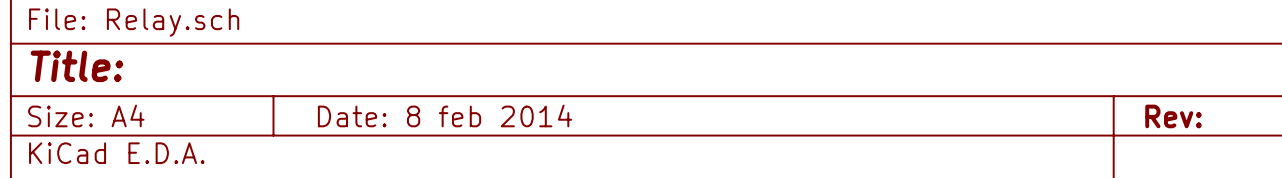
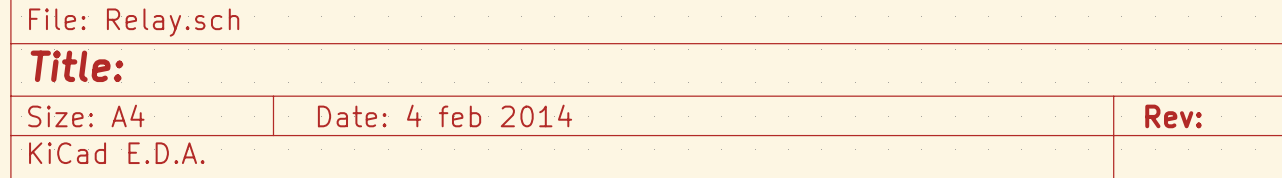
title block: Date: 8 feb 2014 (445, 115) -> Date: 4 feb 2014 (445, 115)

